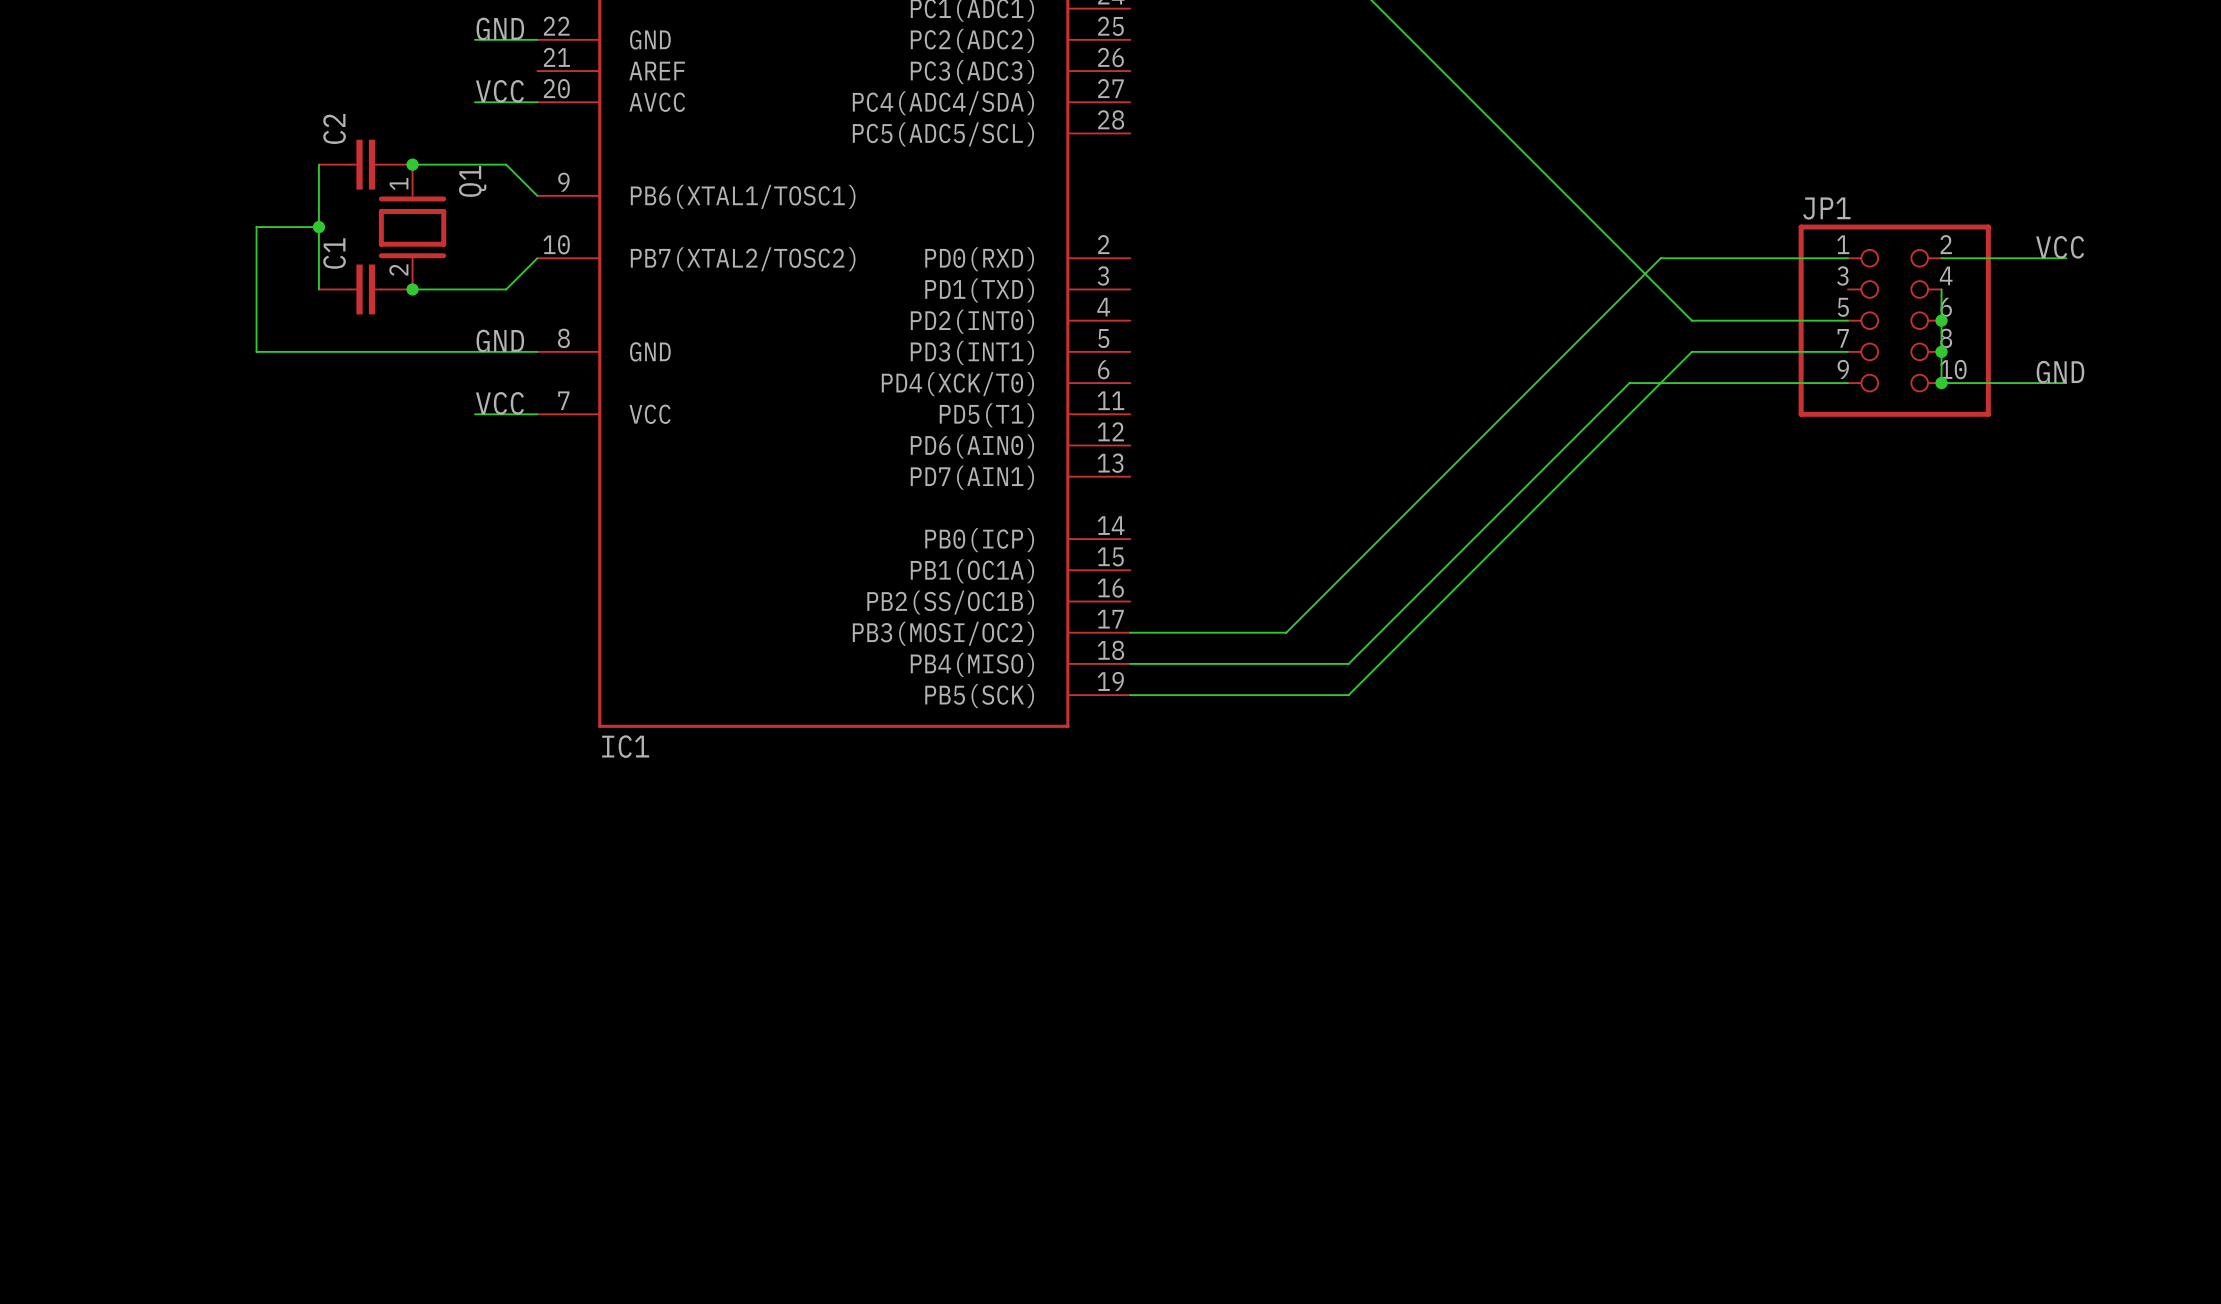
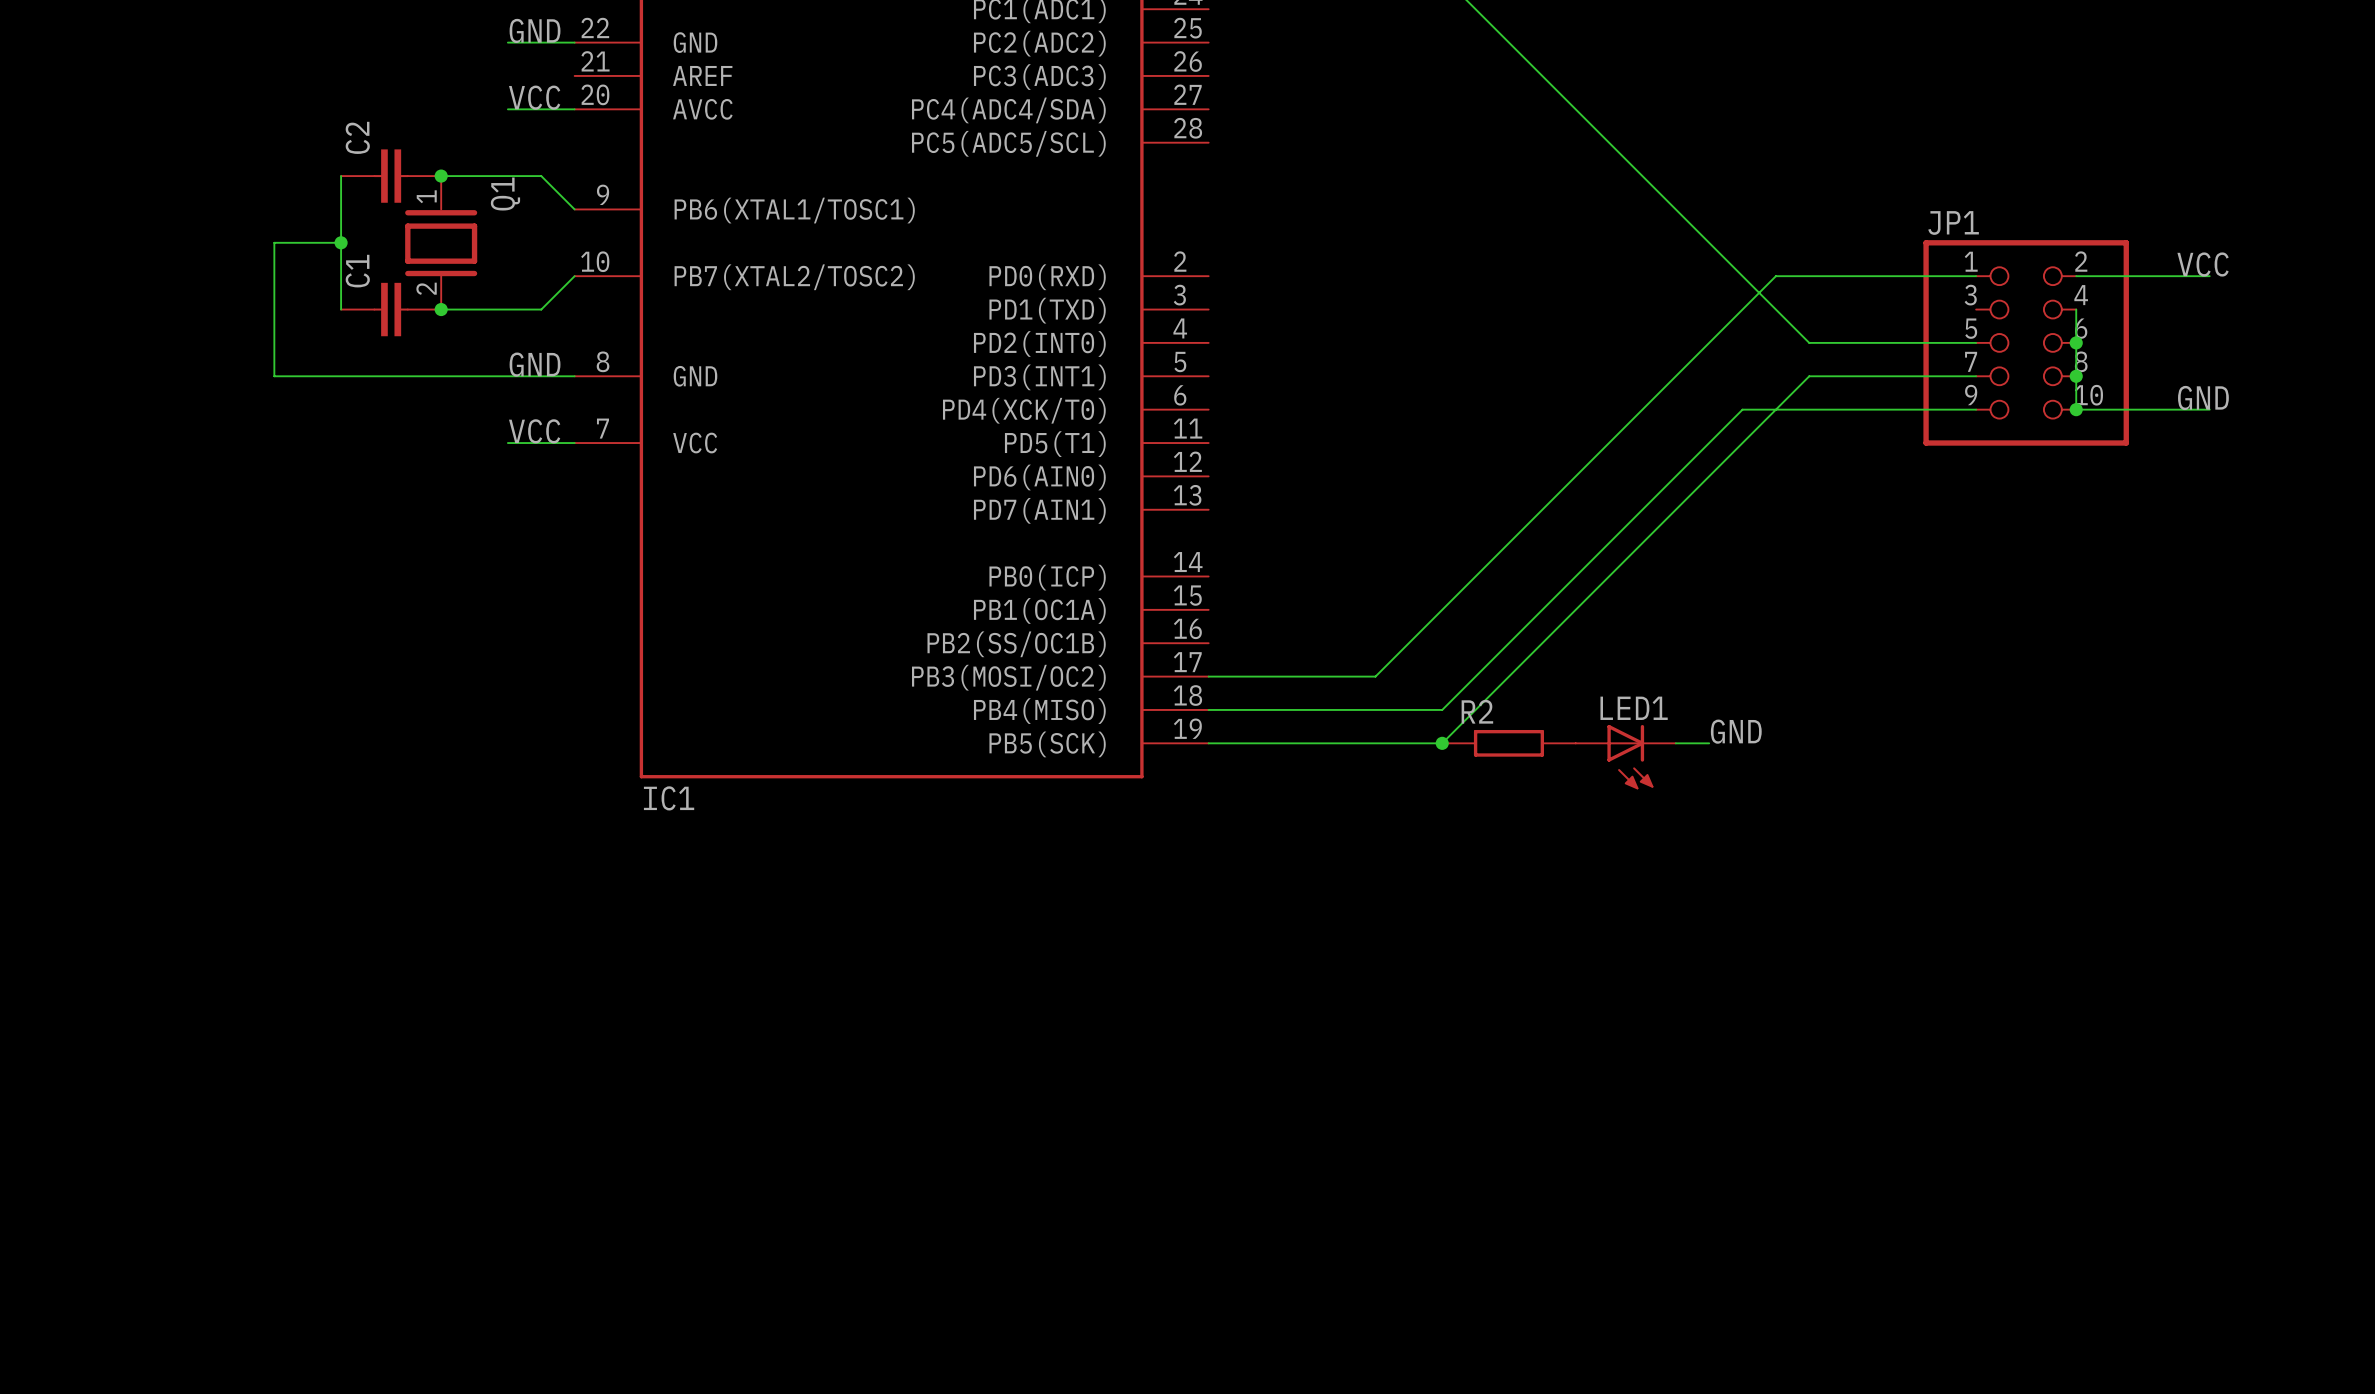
label: none -> GND (1736, 731)
junction: none -> (1442, 743)
R2: none -> (1508, 743)
wire: none -> (1675, 743) (1709, 743)
LED1: none -> (1625, 757)

